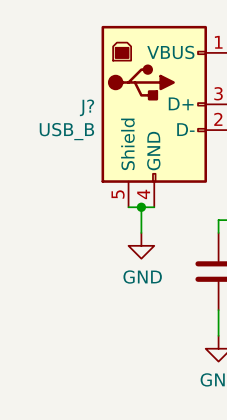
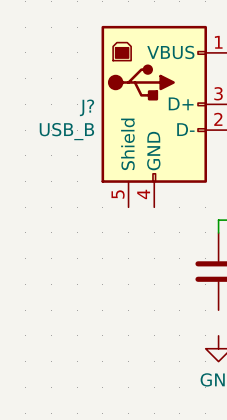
wire: (128, 207) (154, 207) -> none
wire: (141, 207) (141, 232) -> none
junction: (141, 207) -> none
power symbol: GND (141, 245) -> none
wire: (218, 310) (218, 335) -> none

